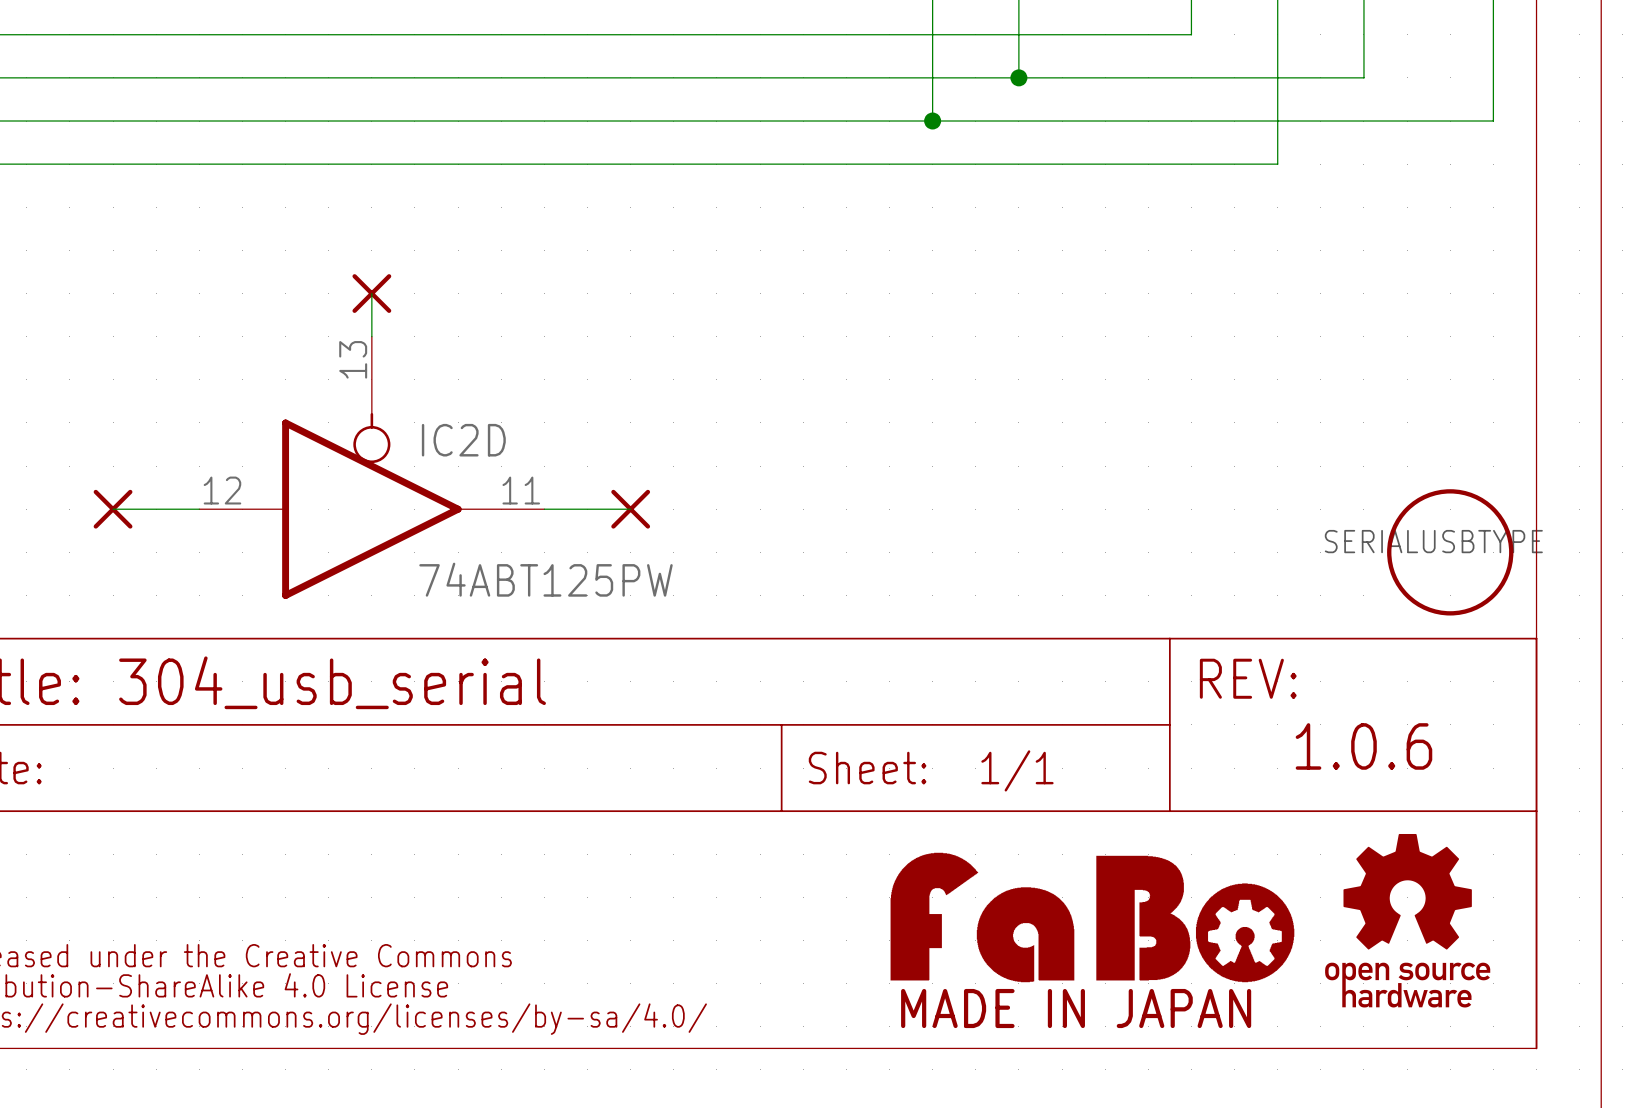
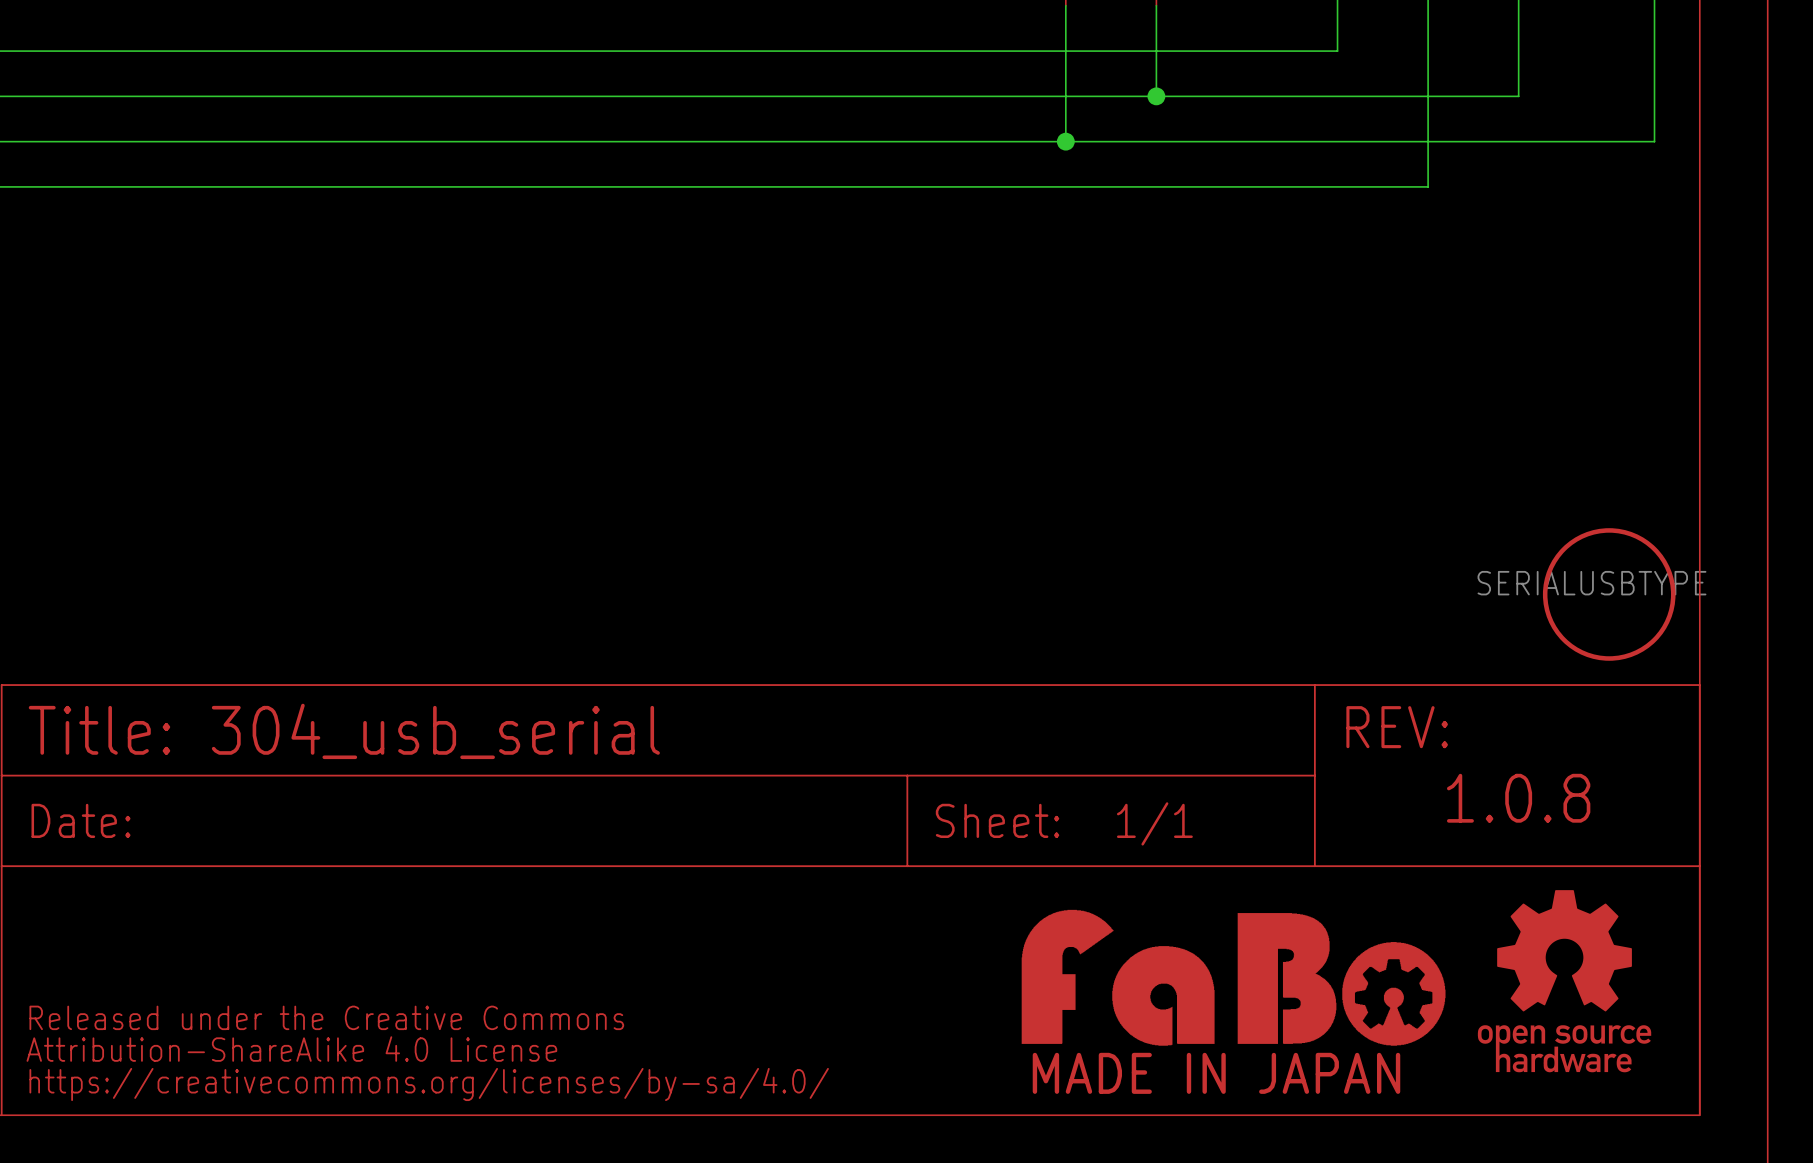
wire: (371, 293) (371, 336) -> none
part: (371, 293) -> none
IC2D: 74ABT125PW (371, 467) -> none
wire: (113, 509) (199, 509) -> none
part: (113, 509) -> none
wire: (544, 509) (630, 509) -> none
part: (630, 509) -> none
text: 1.0.6 (1363, 746) -> 1.0.8 (1518, 798)

